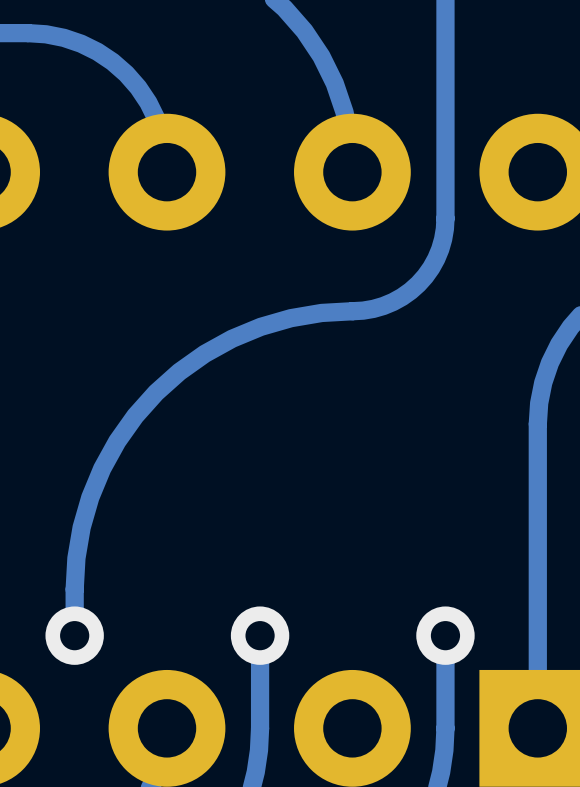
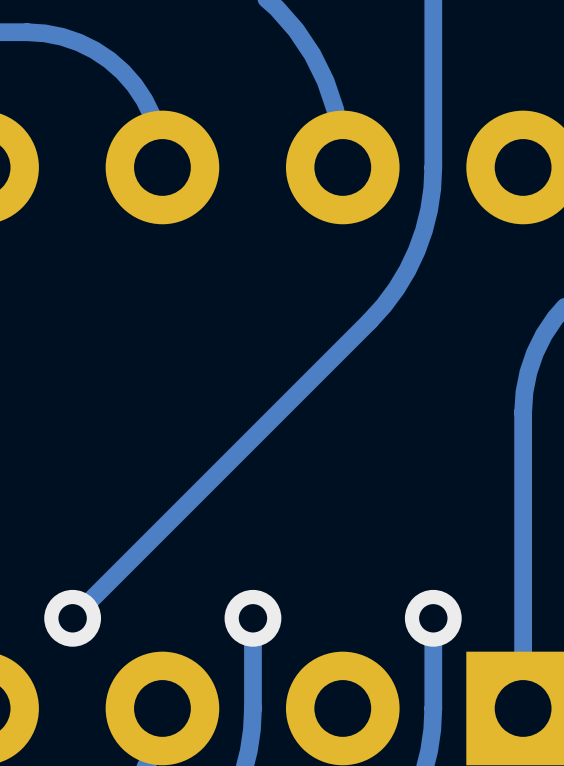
track: (445, 172) (444, 228) (440, 249) (431, 267) (410, 290) (392, 302) (373, 308) (321, 312) (290, 318) (260, 326) (232, 338) (204, 353) (179, 371) (156, 392) (135, 415) (117, 441) (102, 468) (90, 497) (81, 527) (76, 558) (74, 635) -> (433, 167) (432, 188) (423, 230) (407, 270) (383, 305) (72, 618)

